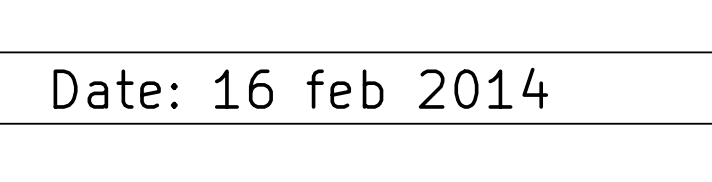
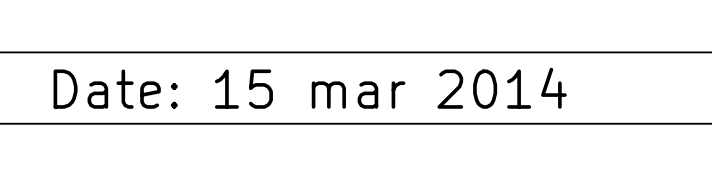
title block: Date: 16 feb 2014 (300, 88) -> Date: 15 mar 2014 (310, 88)

